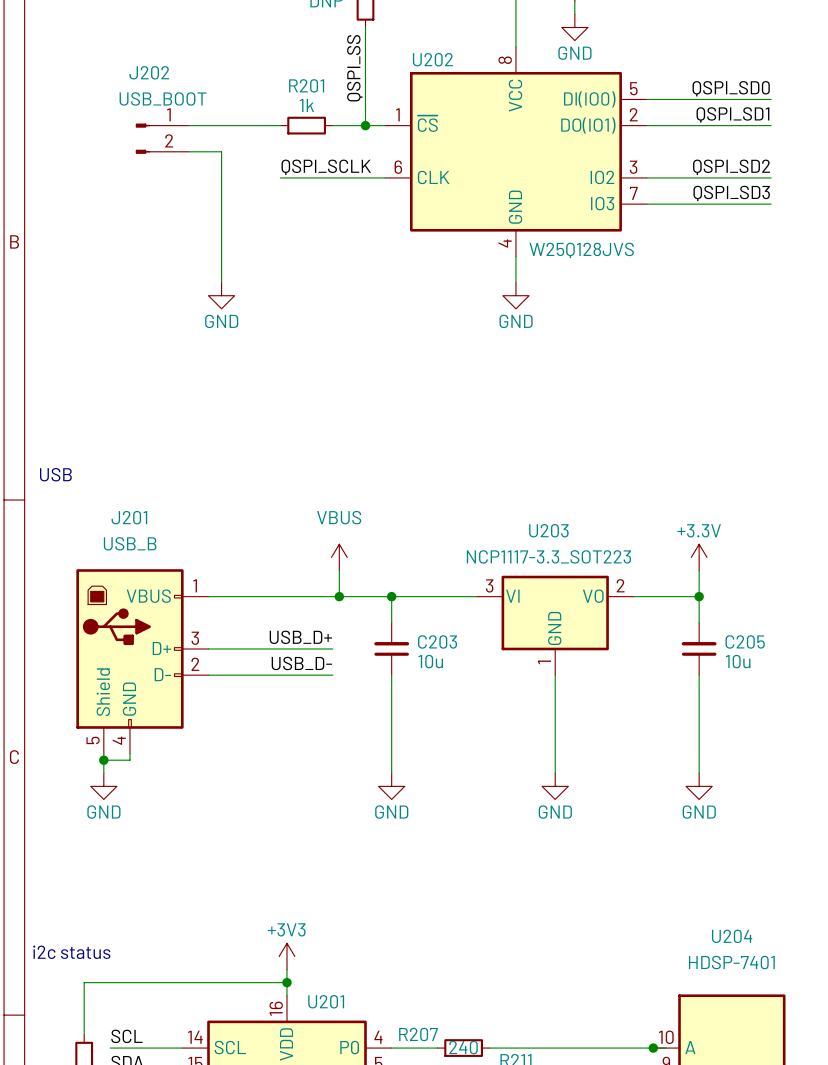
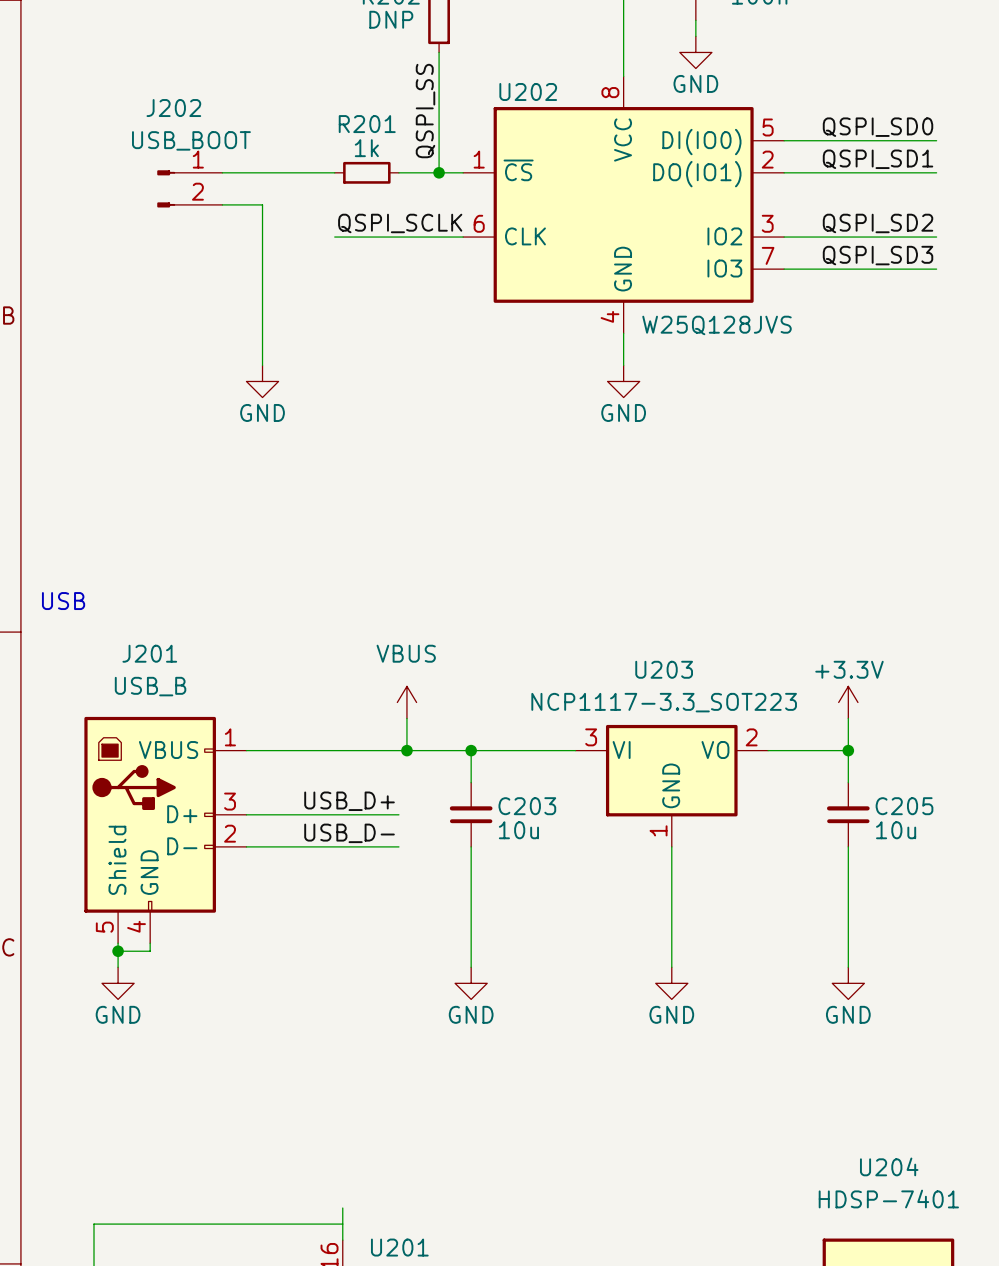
text: i2c status (71, 952) -> none
power symbol: +3V3 (286, 956) -> none
junction: (286, 982) -> none

